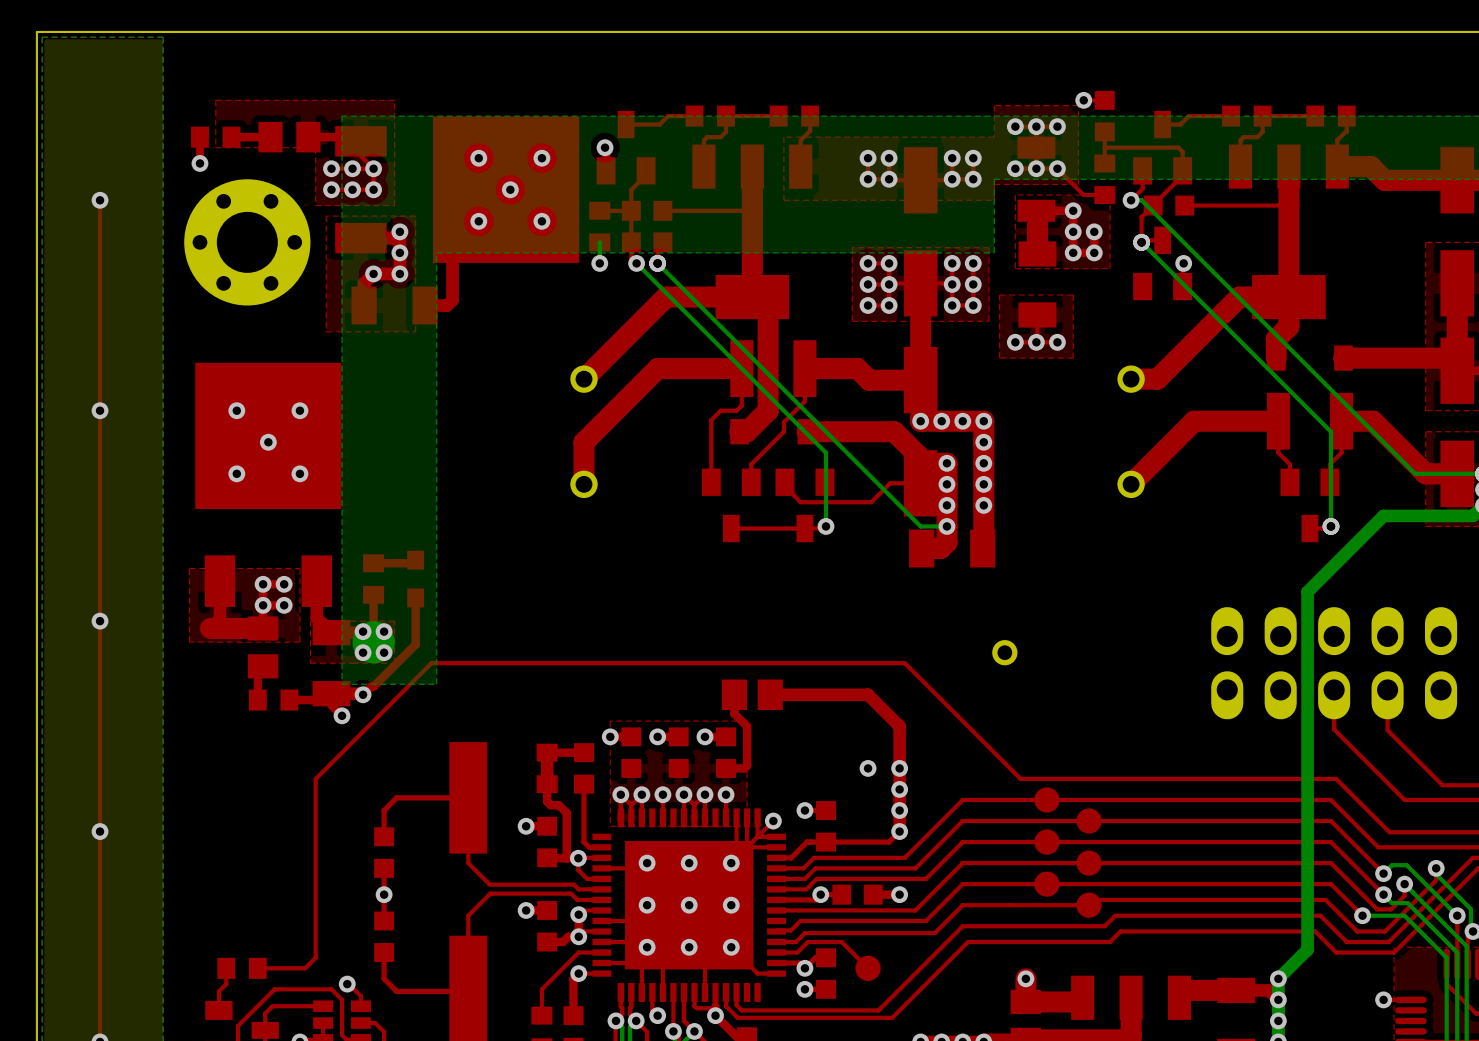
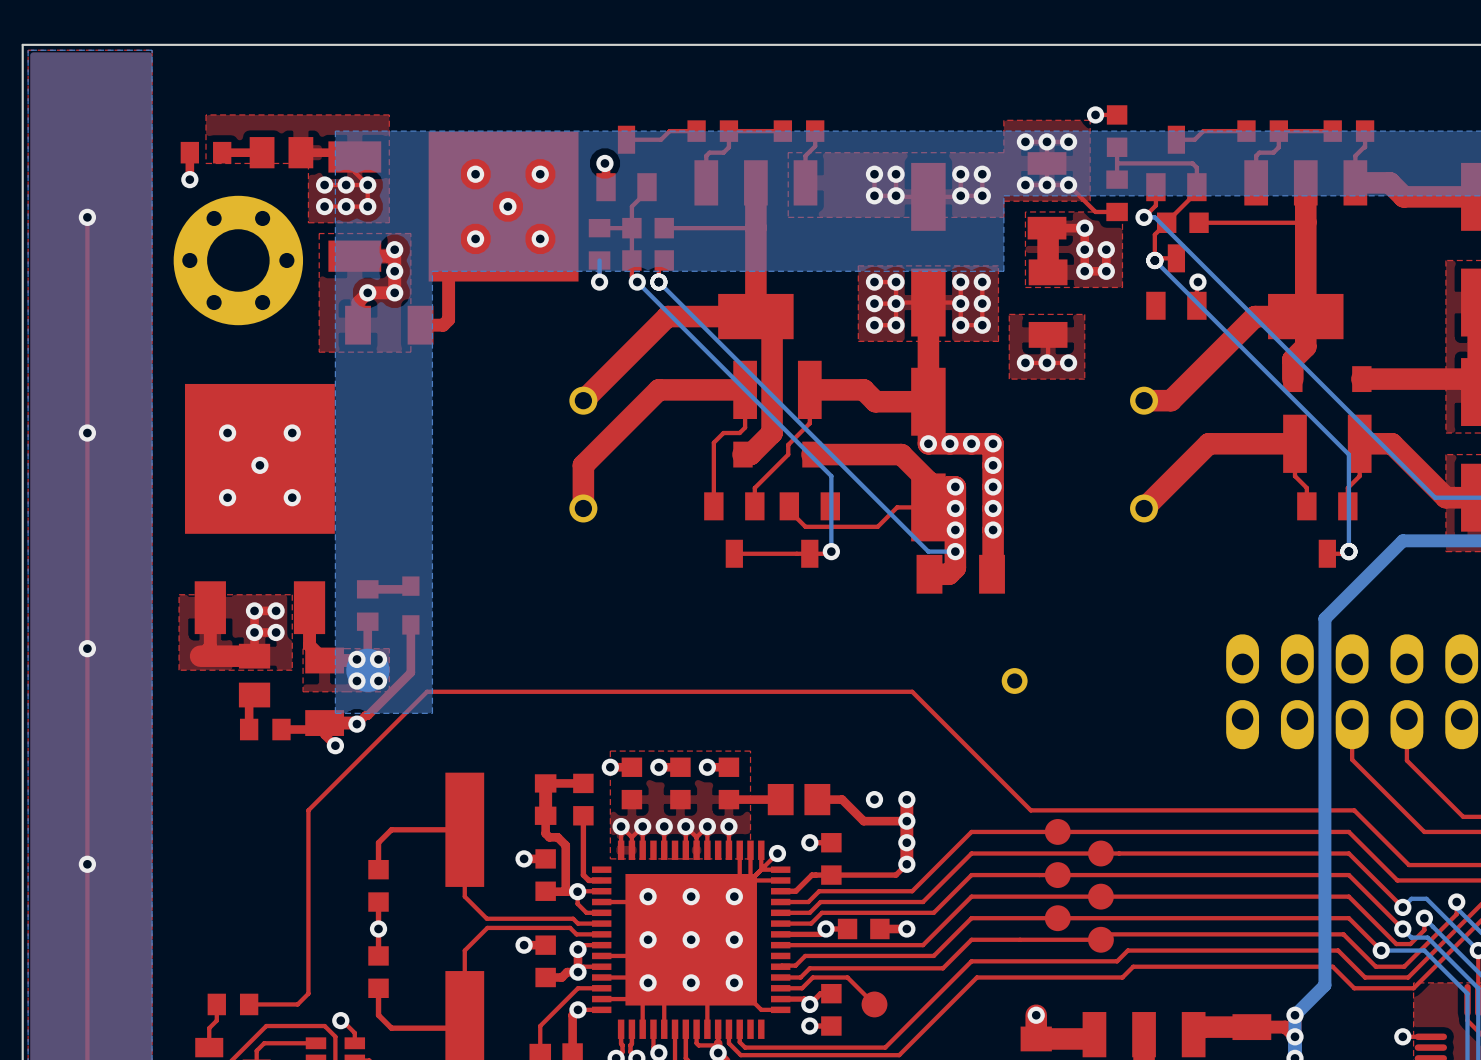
top track: (734, 694) (734, 713) (747, 726) (747, 765) (744, 768) -> (780, 799) (747, 799)
part position: (752, 694) -> (799, 799)
top track: (770, 694) (868, 694) (899, 726) (899, 768) -> none
top track: none -> (817, 799) (842, 799) (863, 821) (906, 821)

